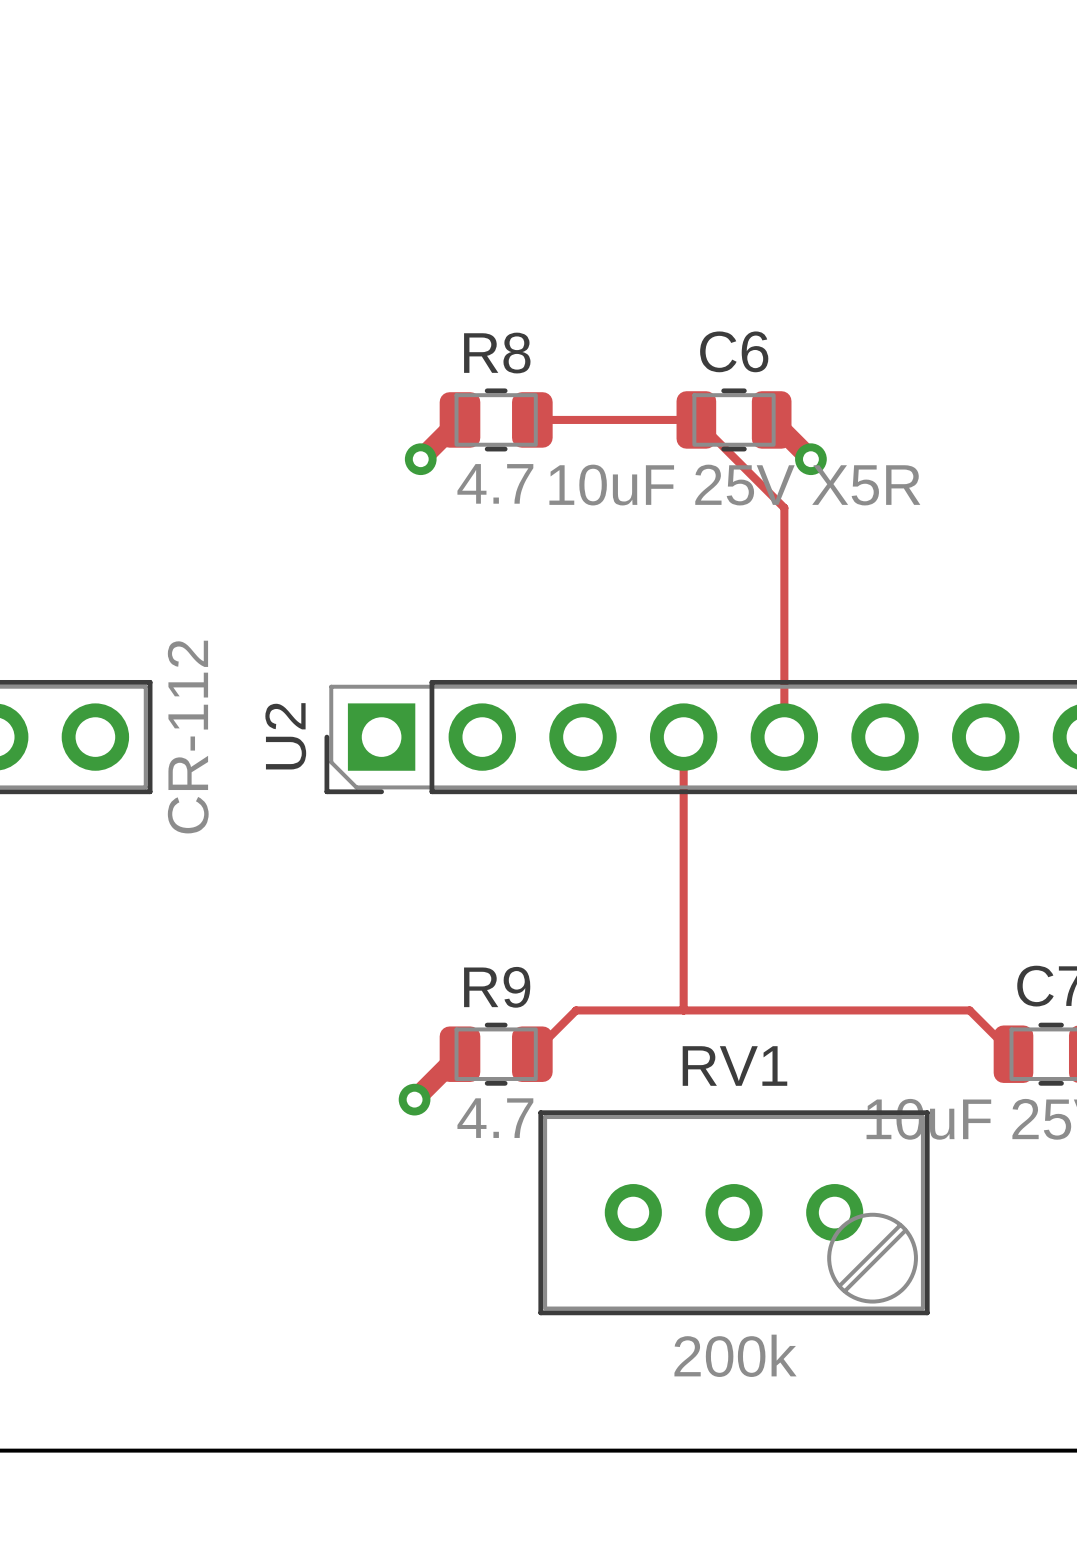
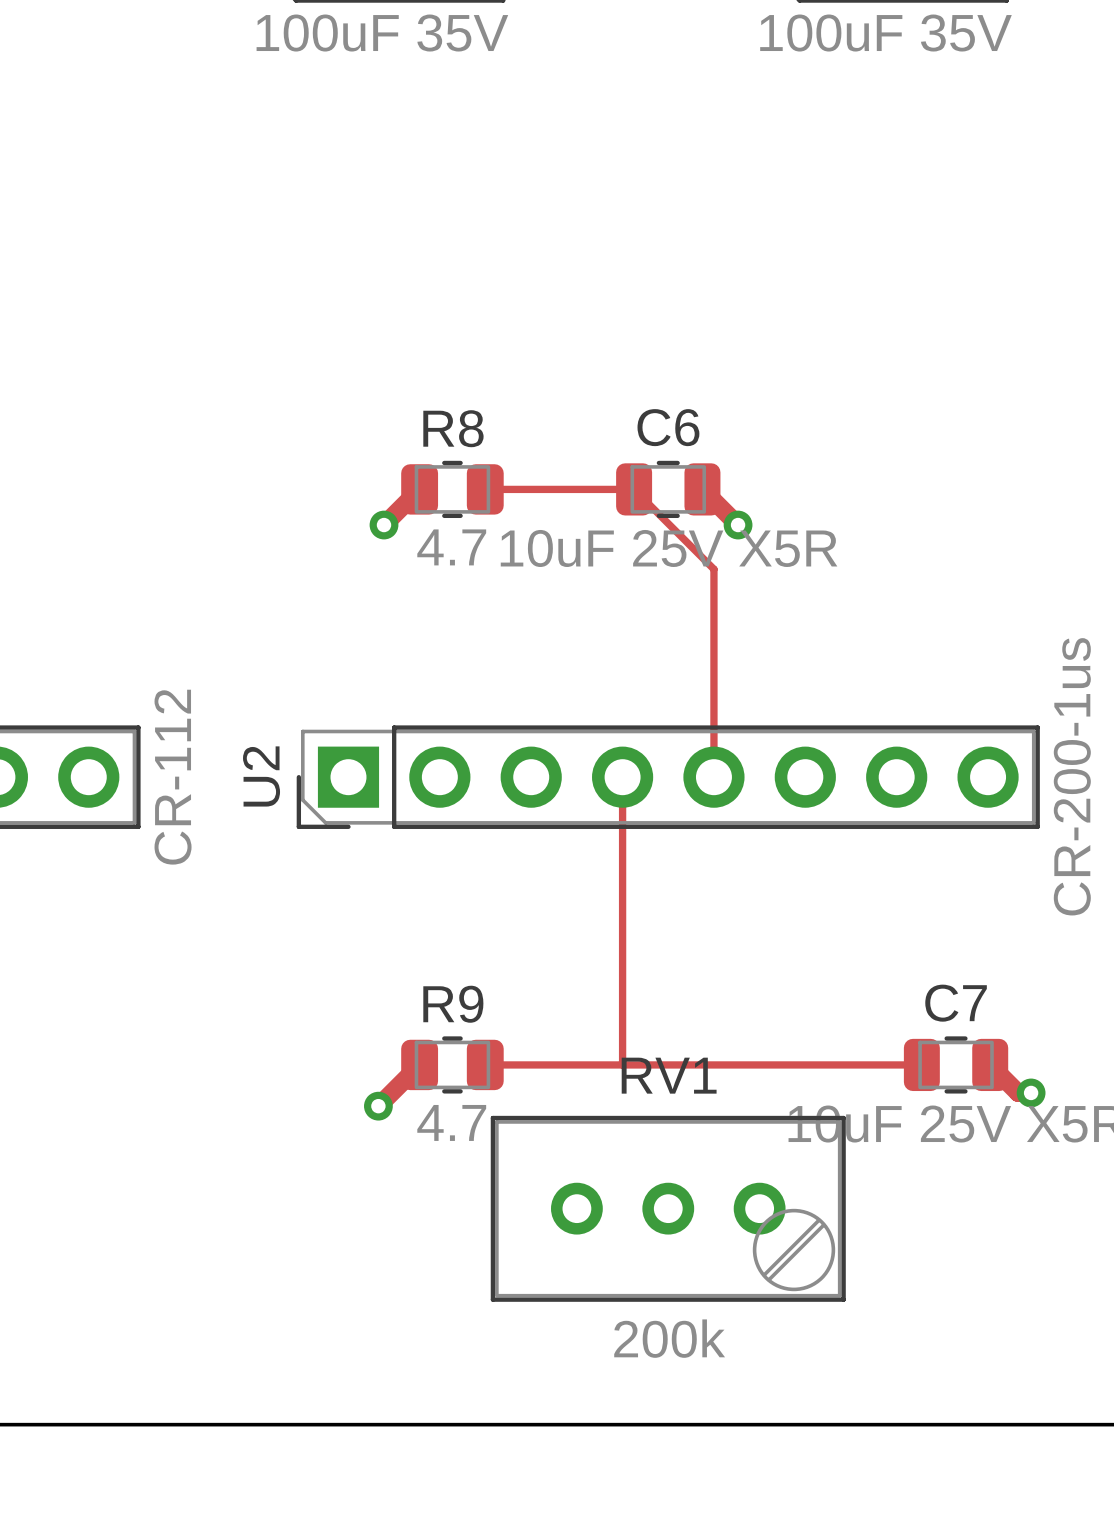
track: none -> (622, 1025) (622, 1064)
track: (532, 1054) (576, 1010) (969, 1010) (1013, 1054) -> (485, 1064) (921, 1064)

